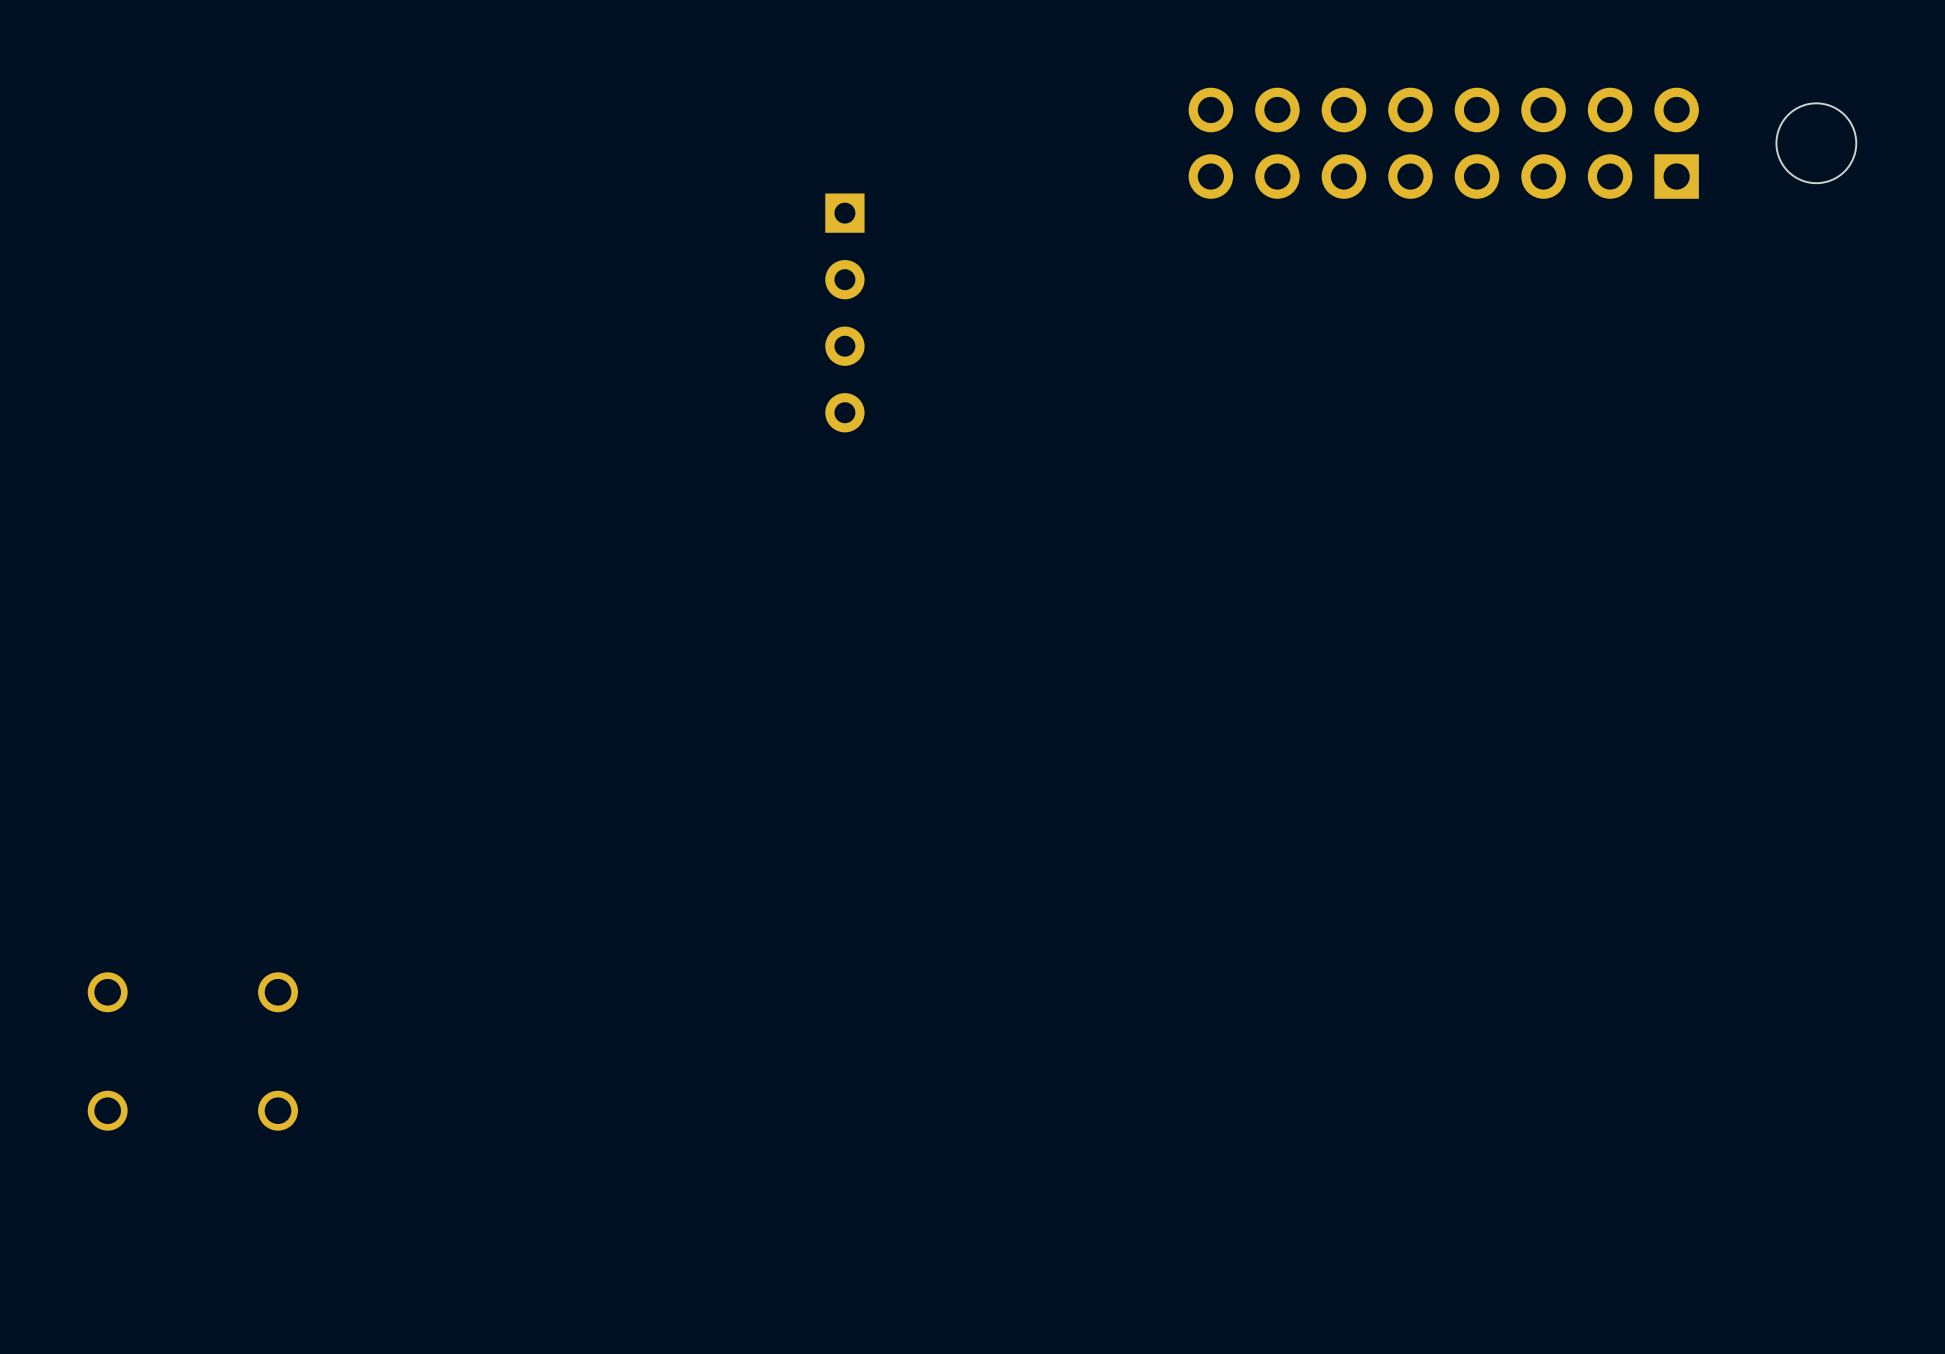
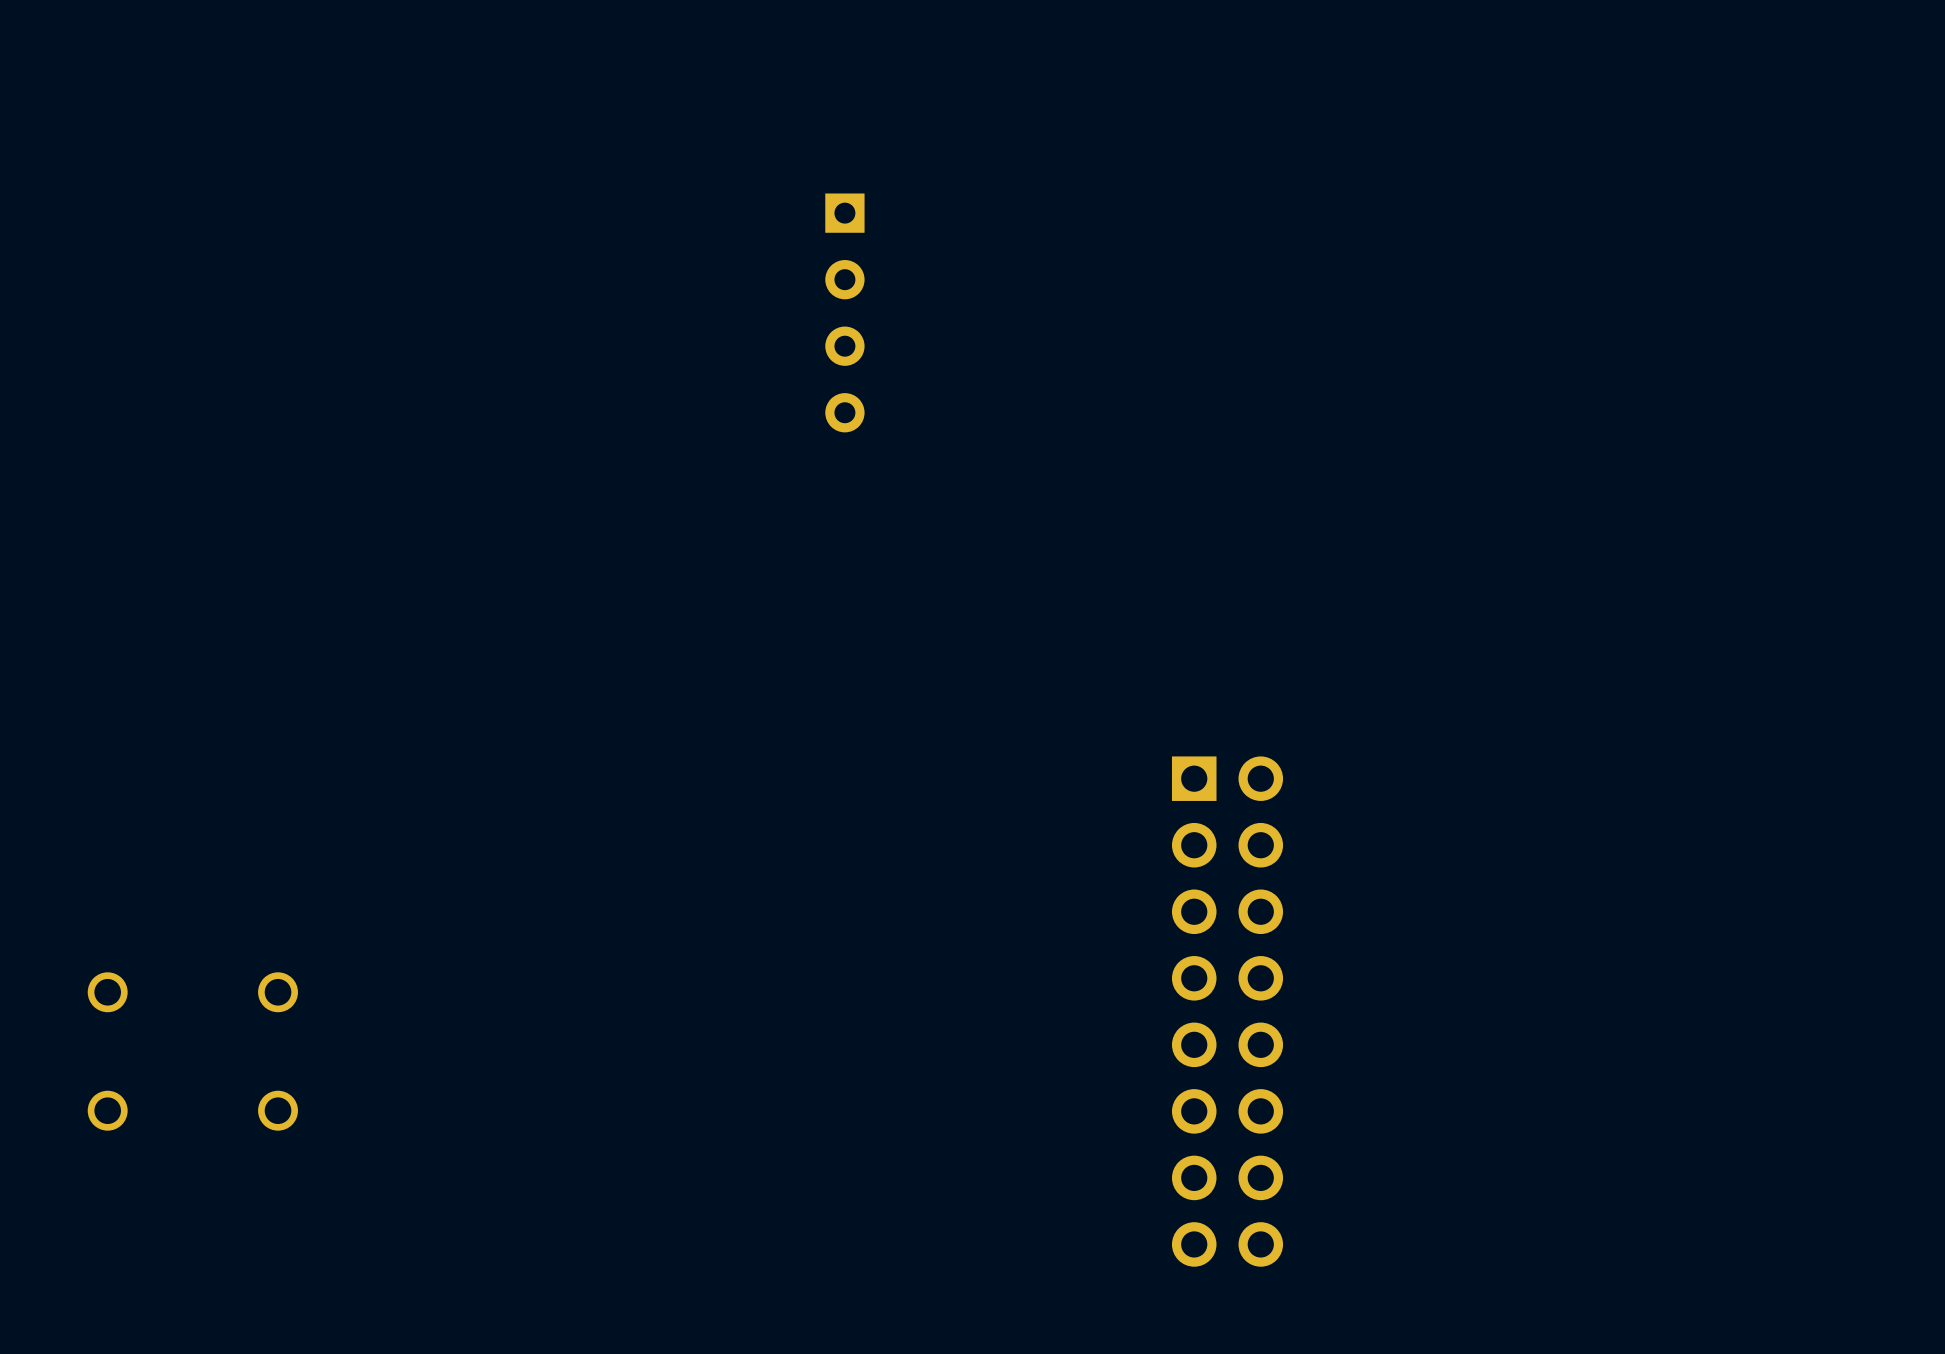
round board edge: [1775, 102, 1857, 184] -> none
part: (1443, 143) -> none
part: none -> (1227, 1011)

